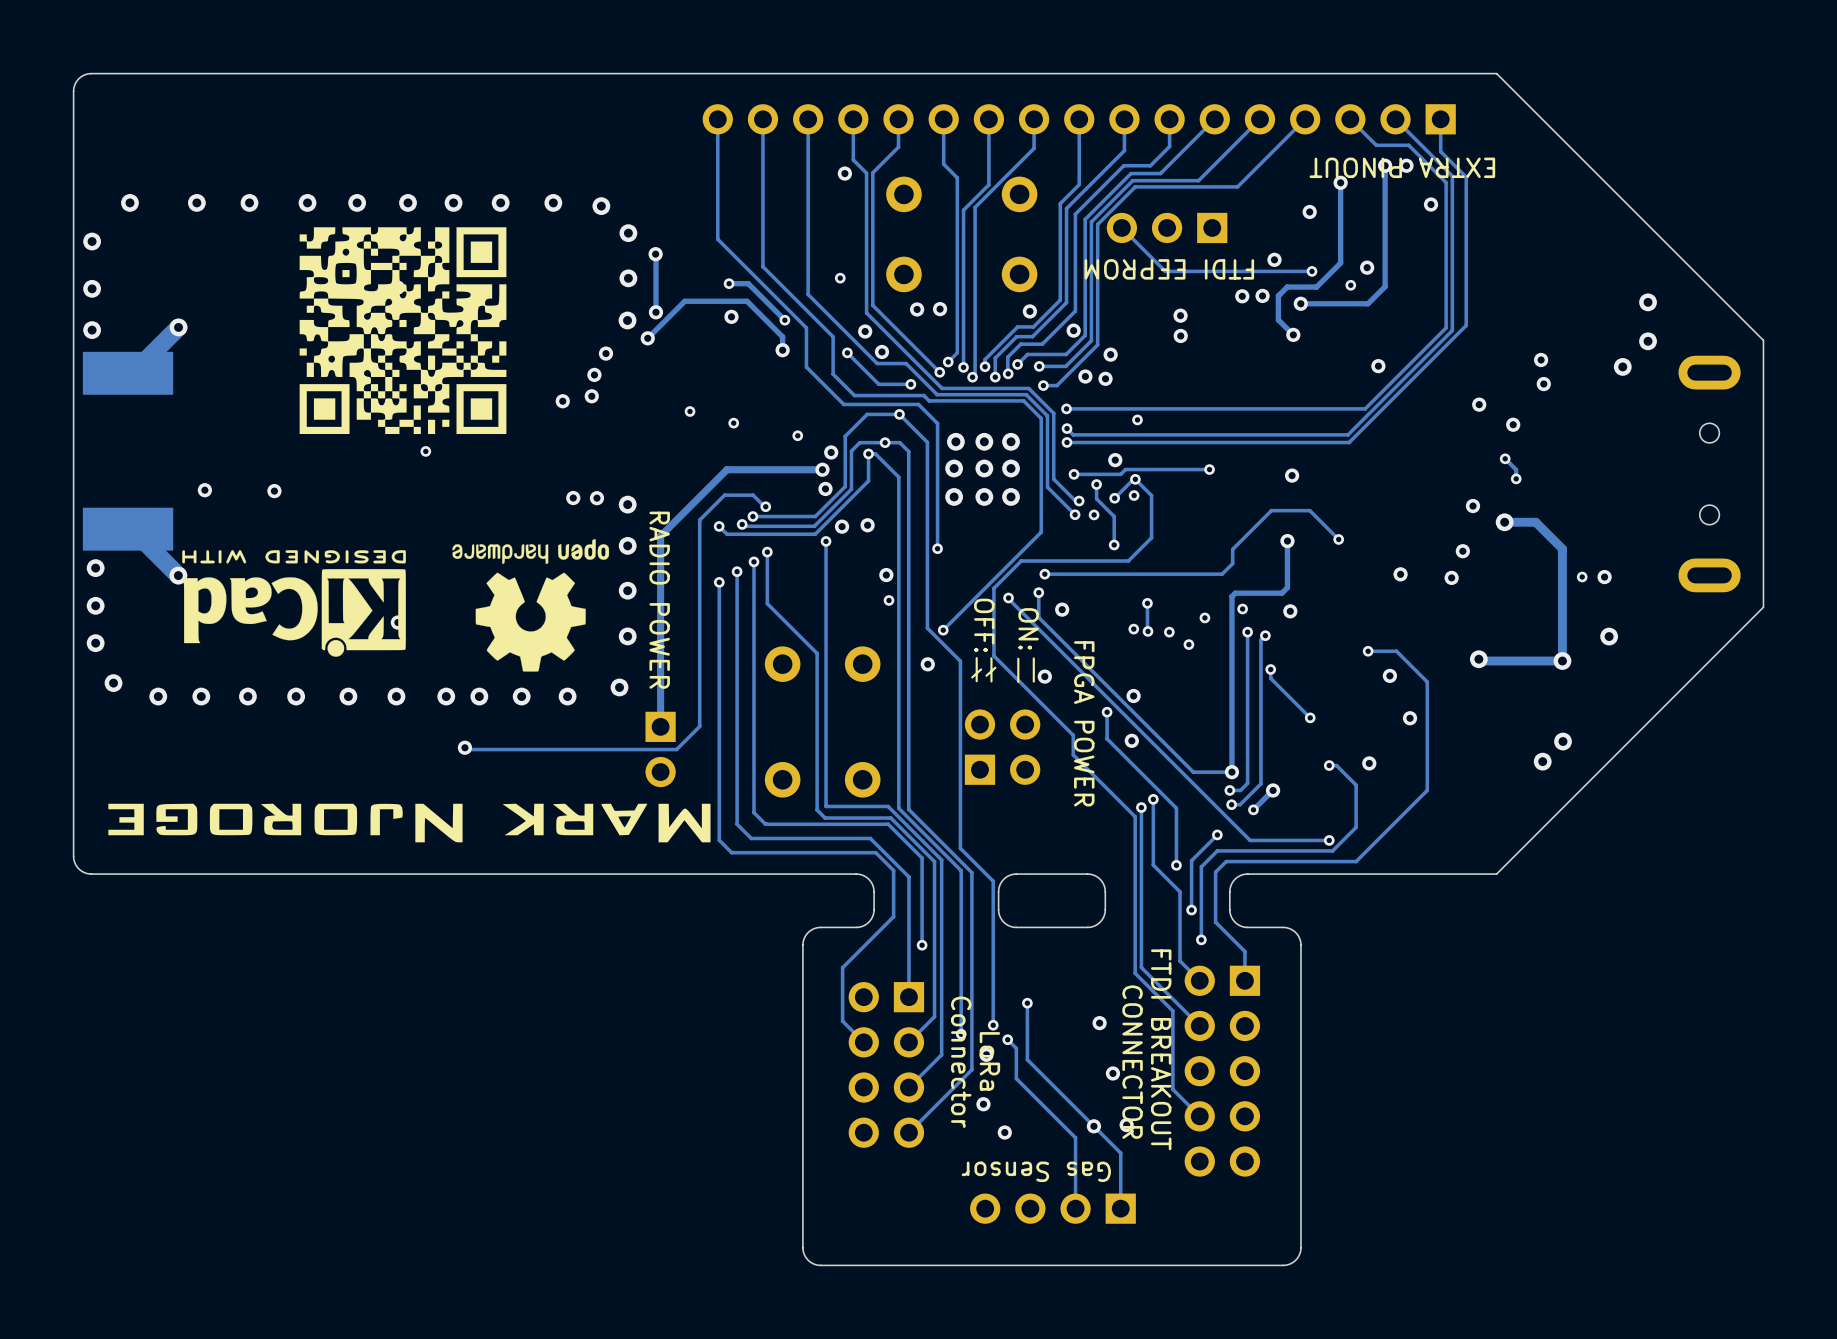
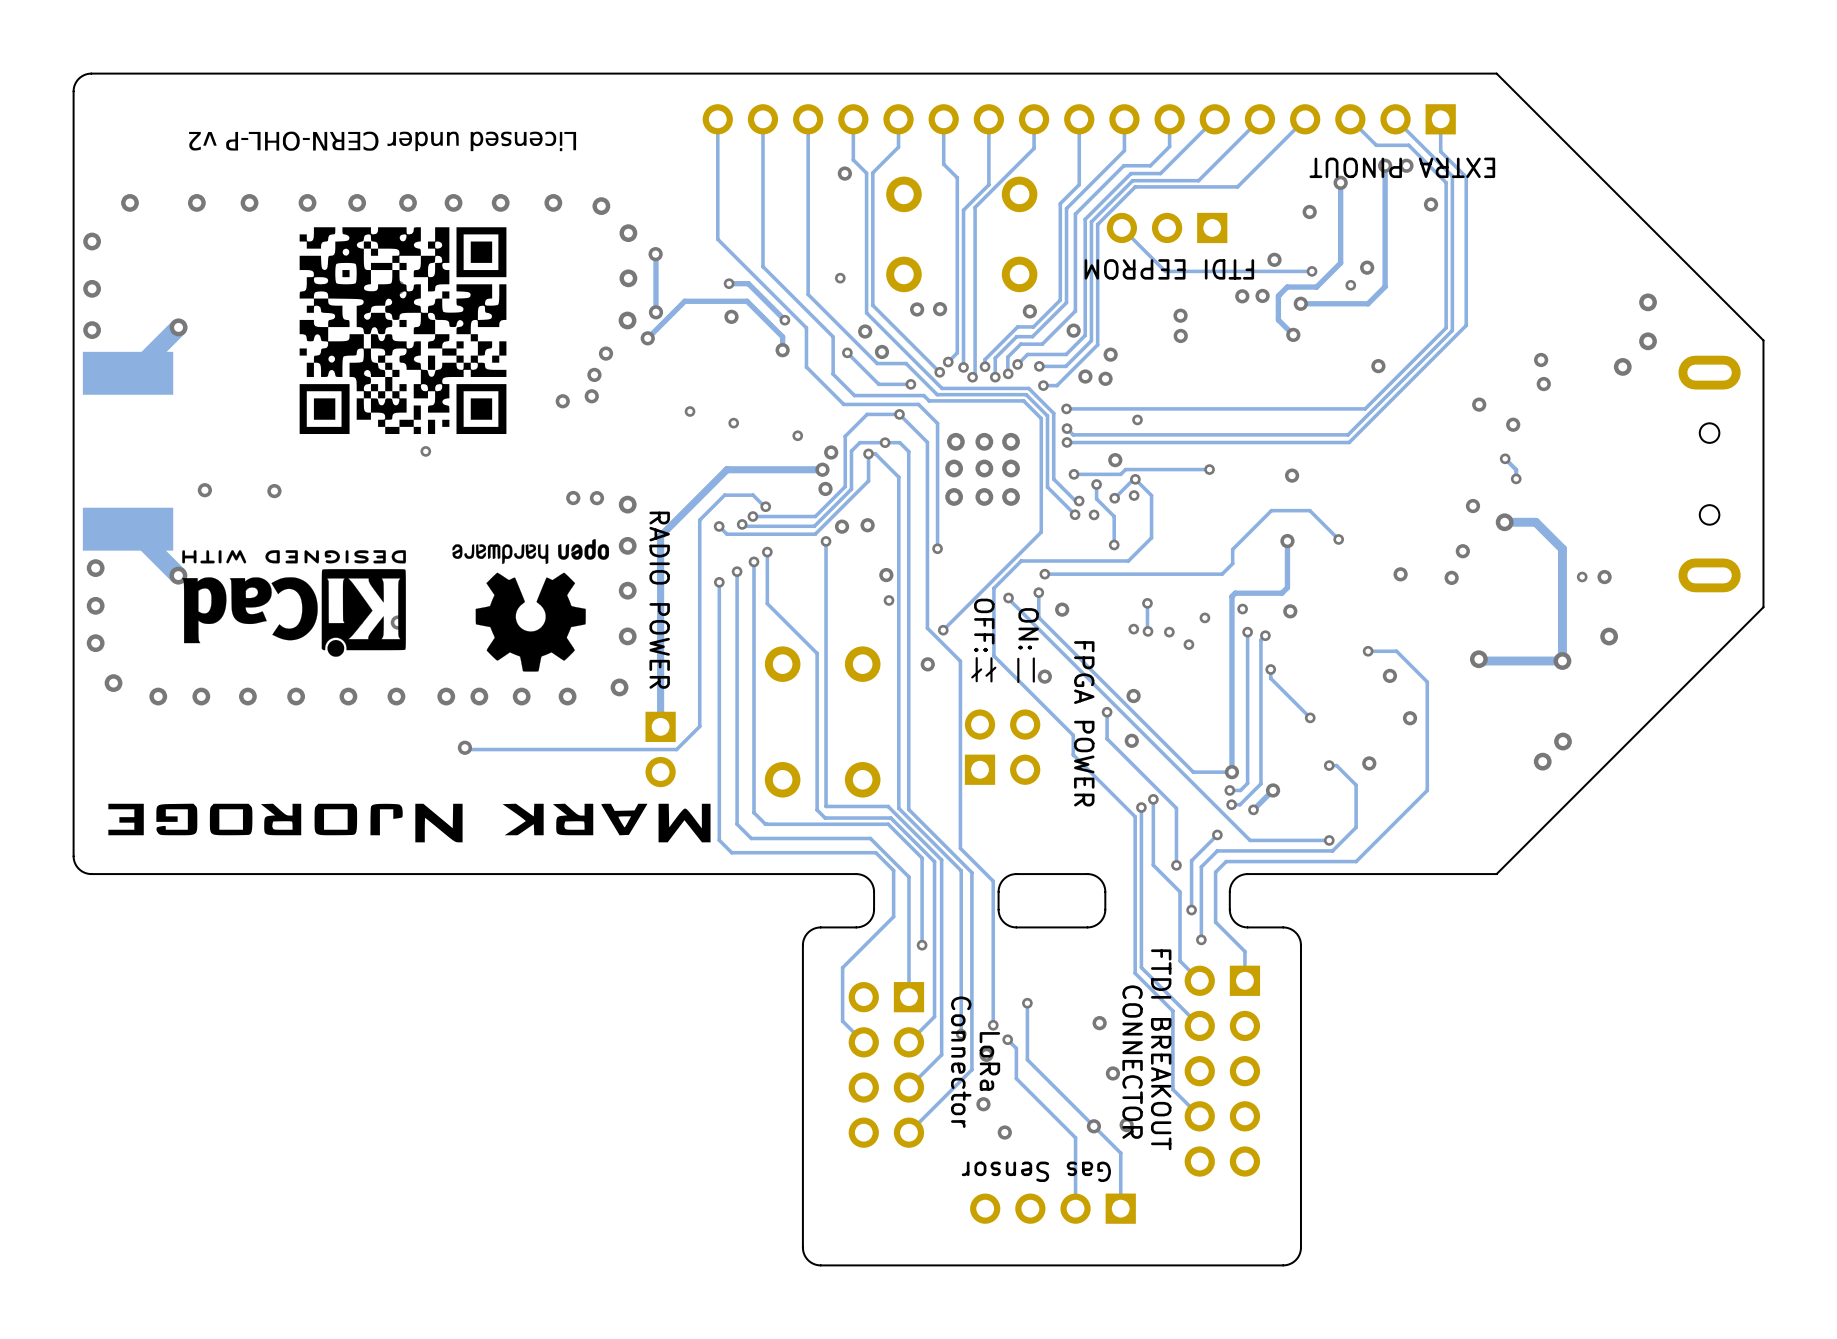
drawing: none -> [189, 131, 577, 152]

